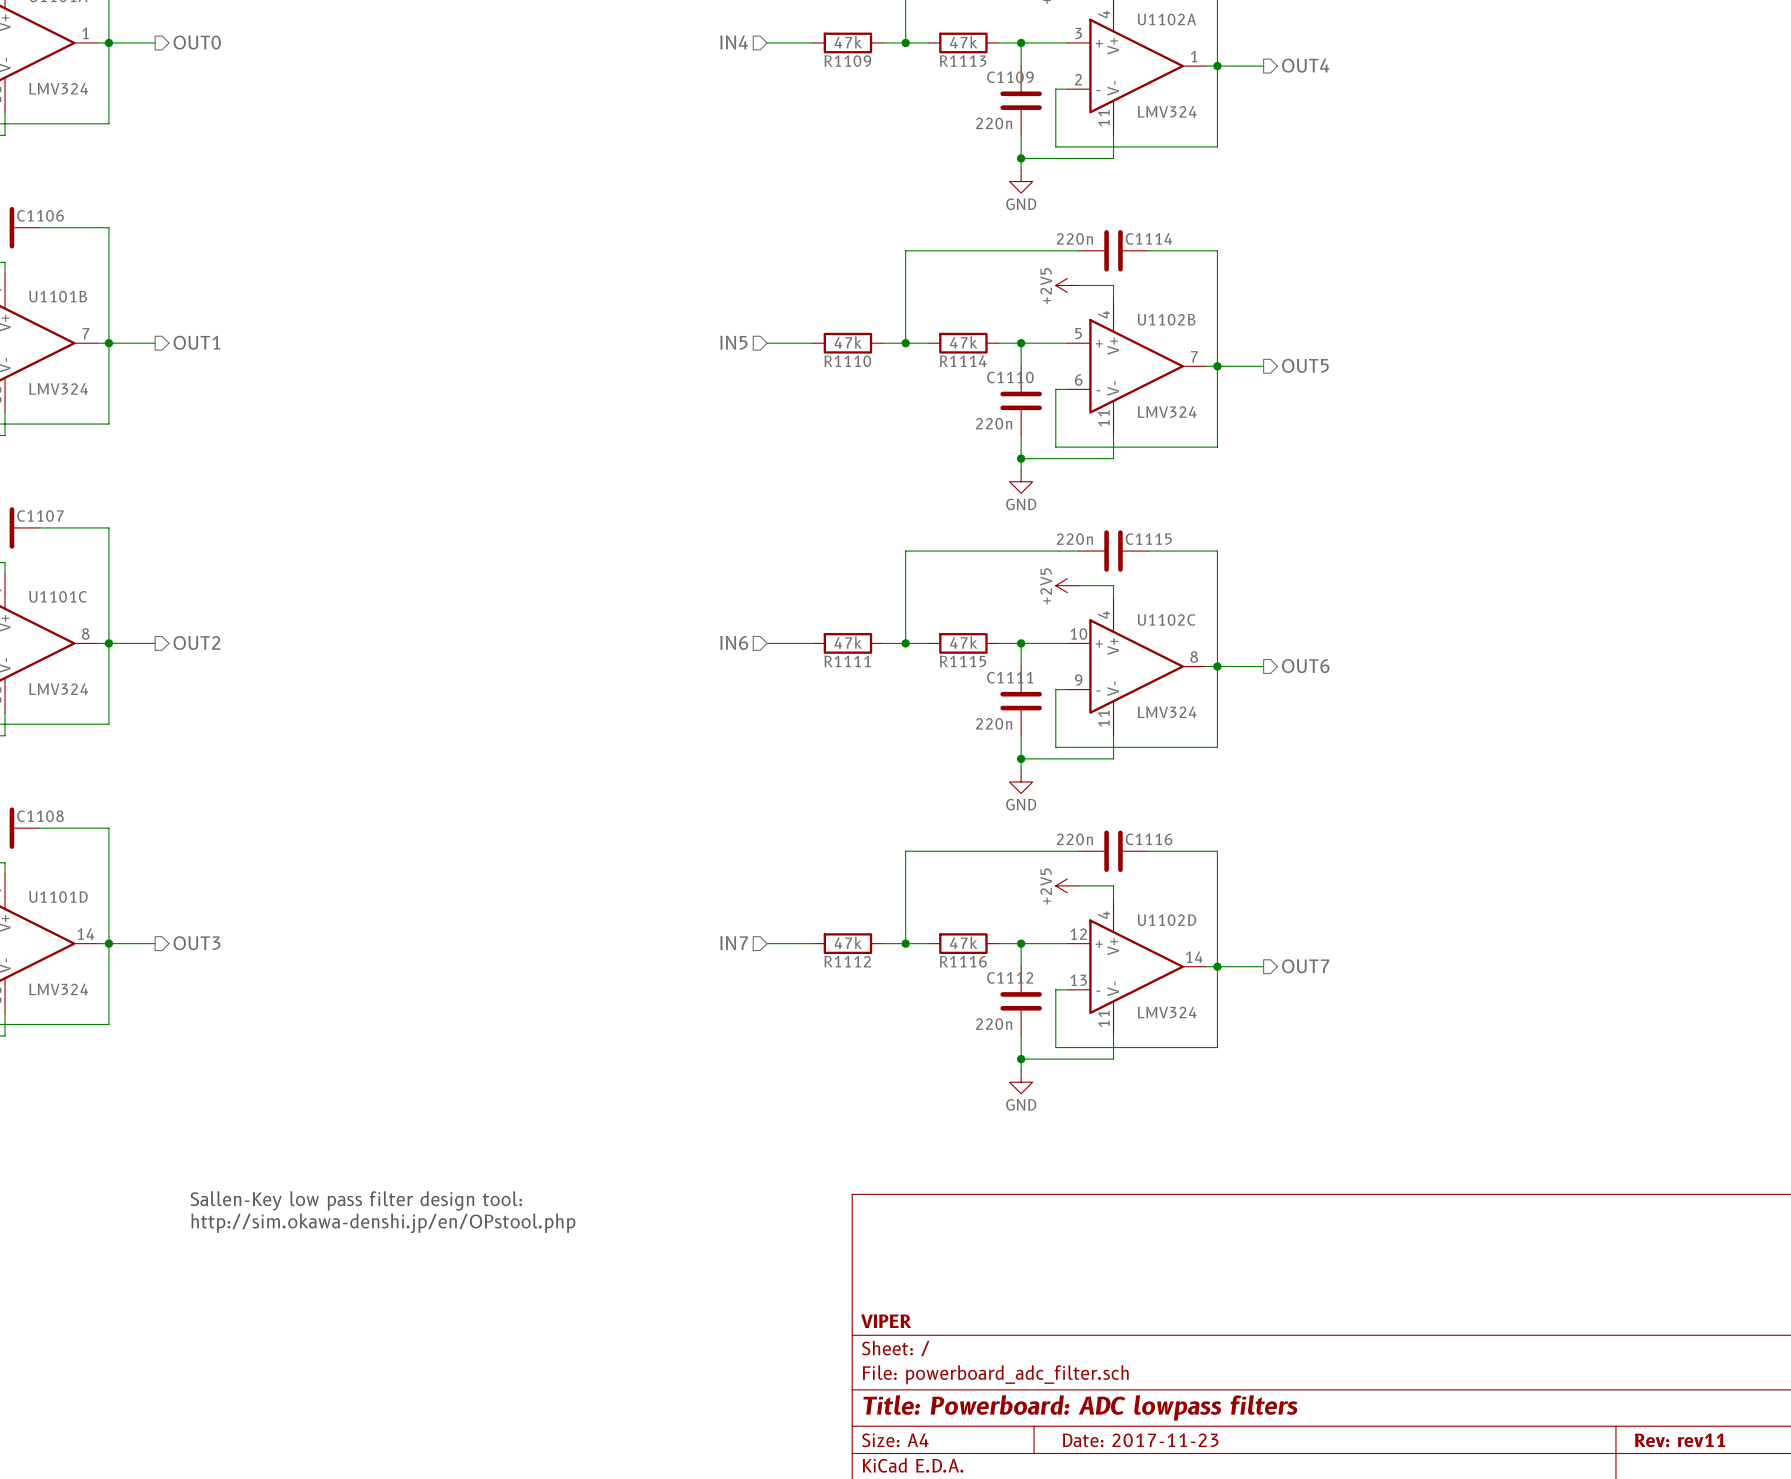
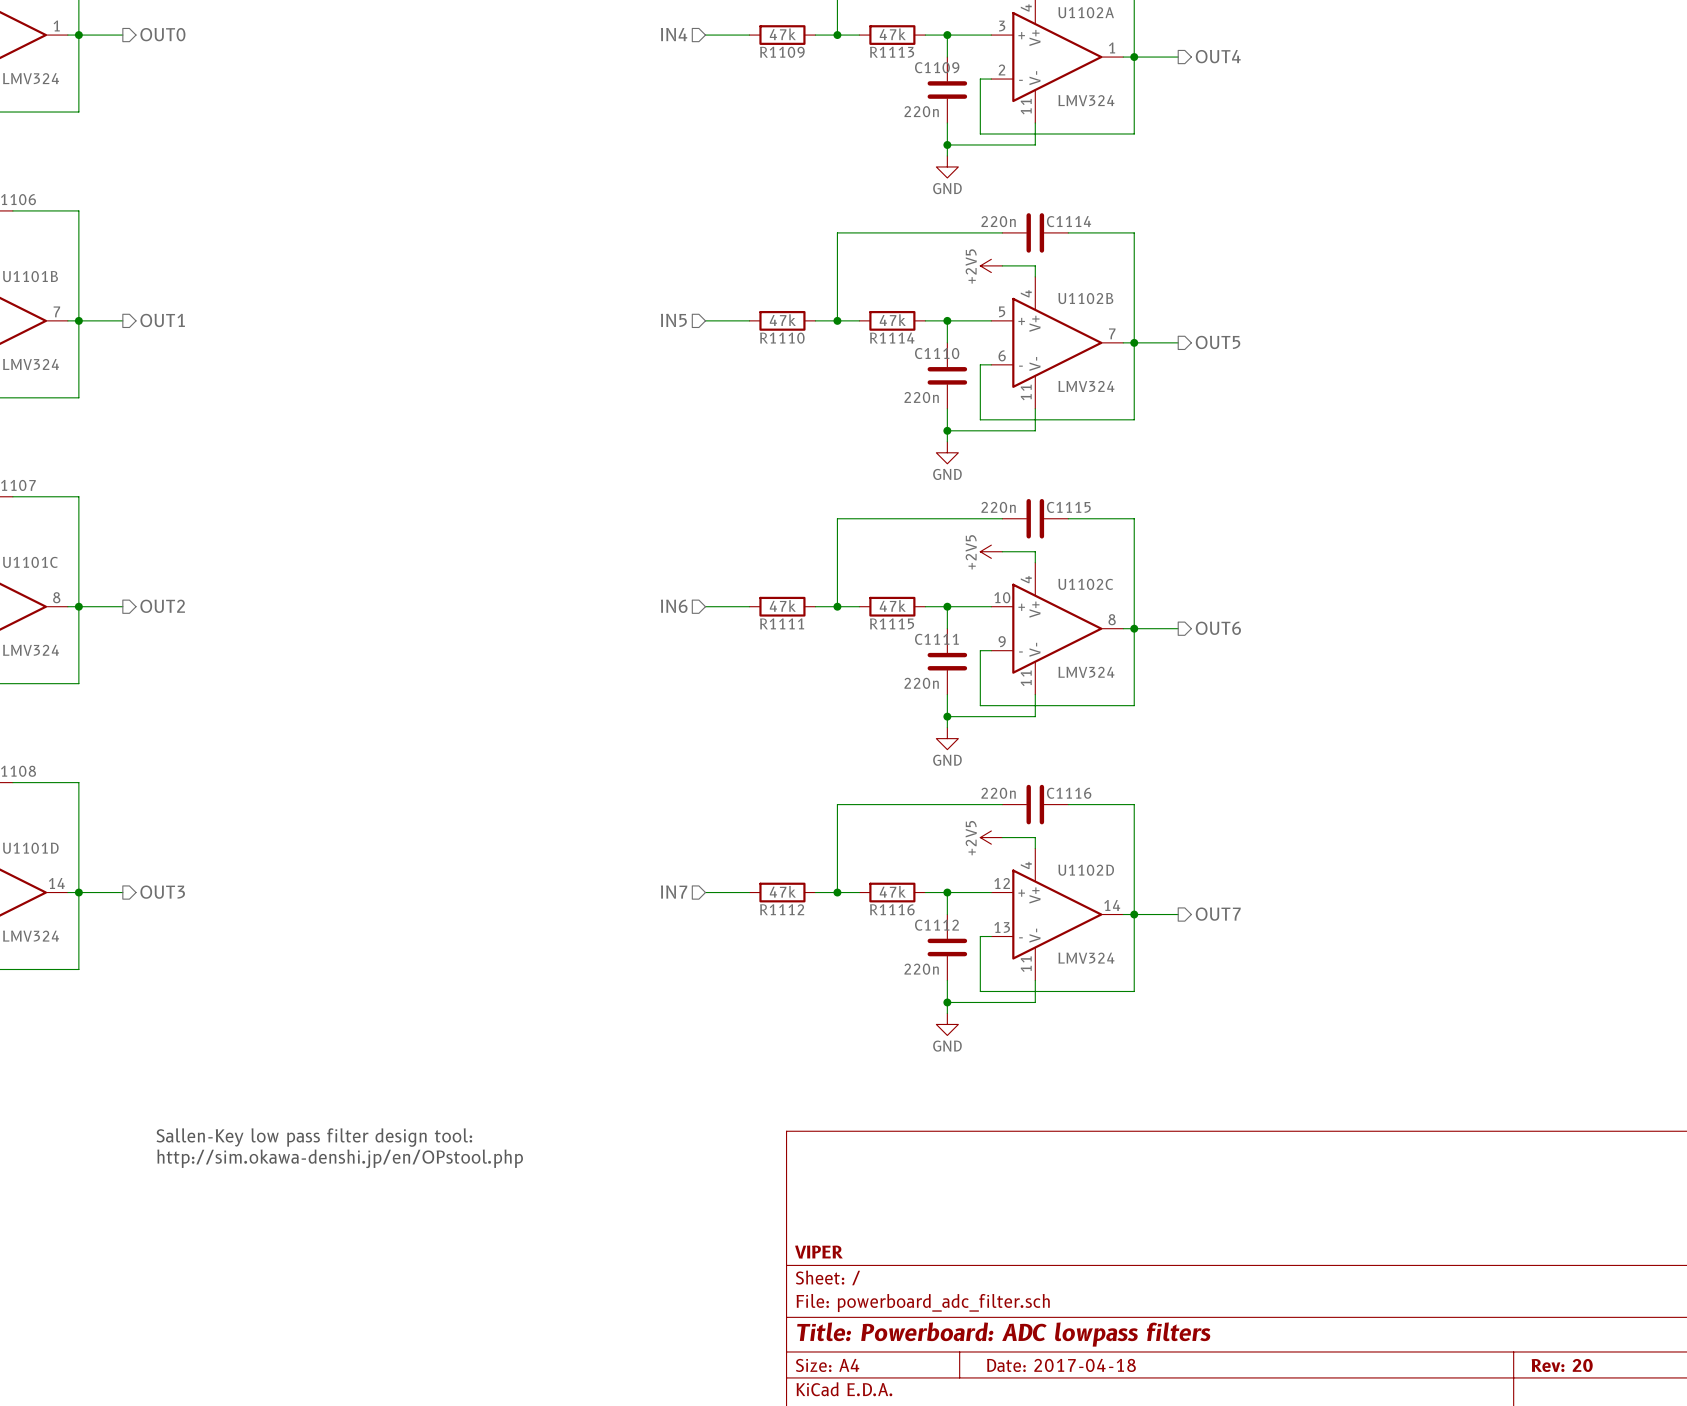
title block: Date: 2017-11-23 (1140, 1440) -> Date: 2017-04-18 (1061, 1365)
title block: Rev: rev11 (1680, 1440) -> Rev: 20 (1562, 1365)

